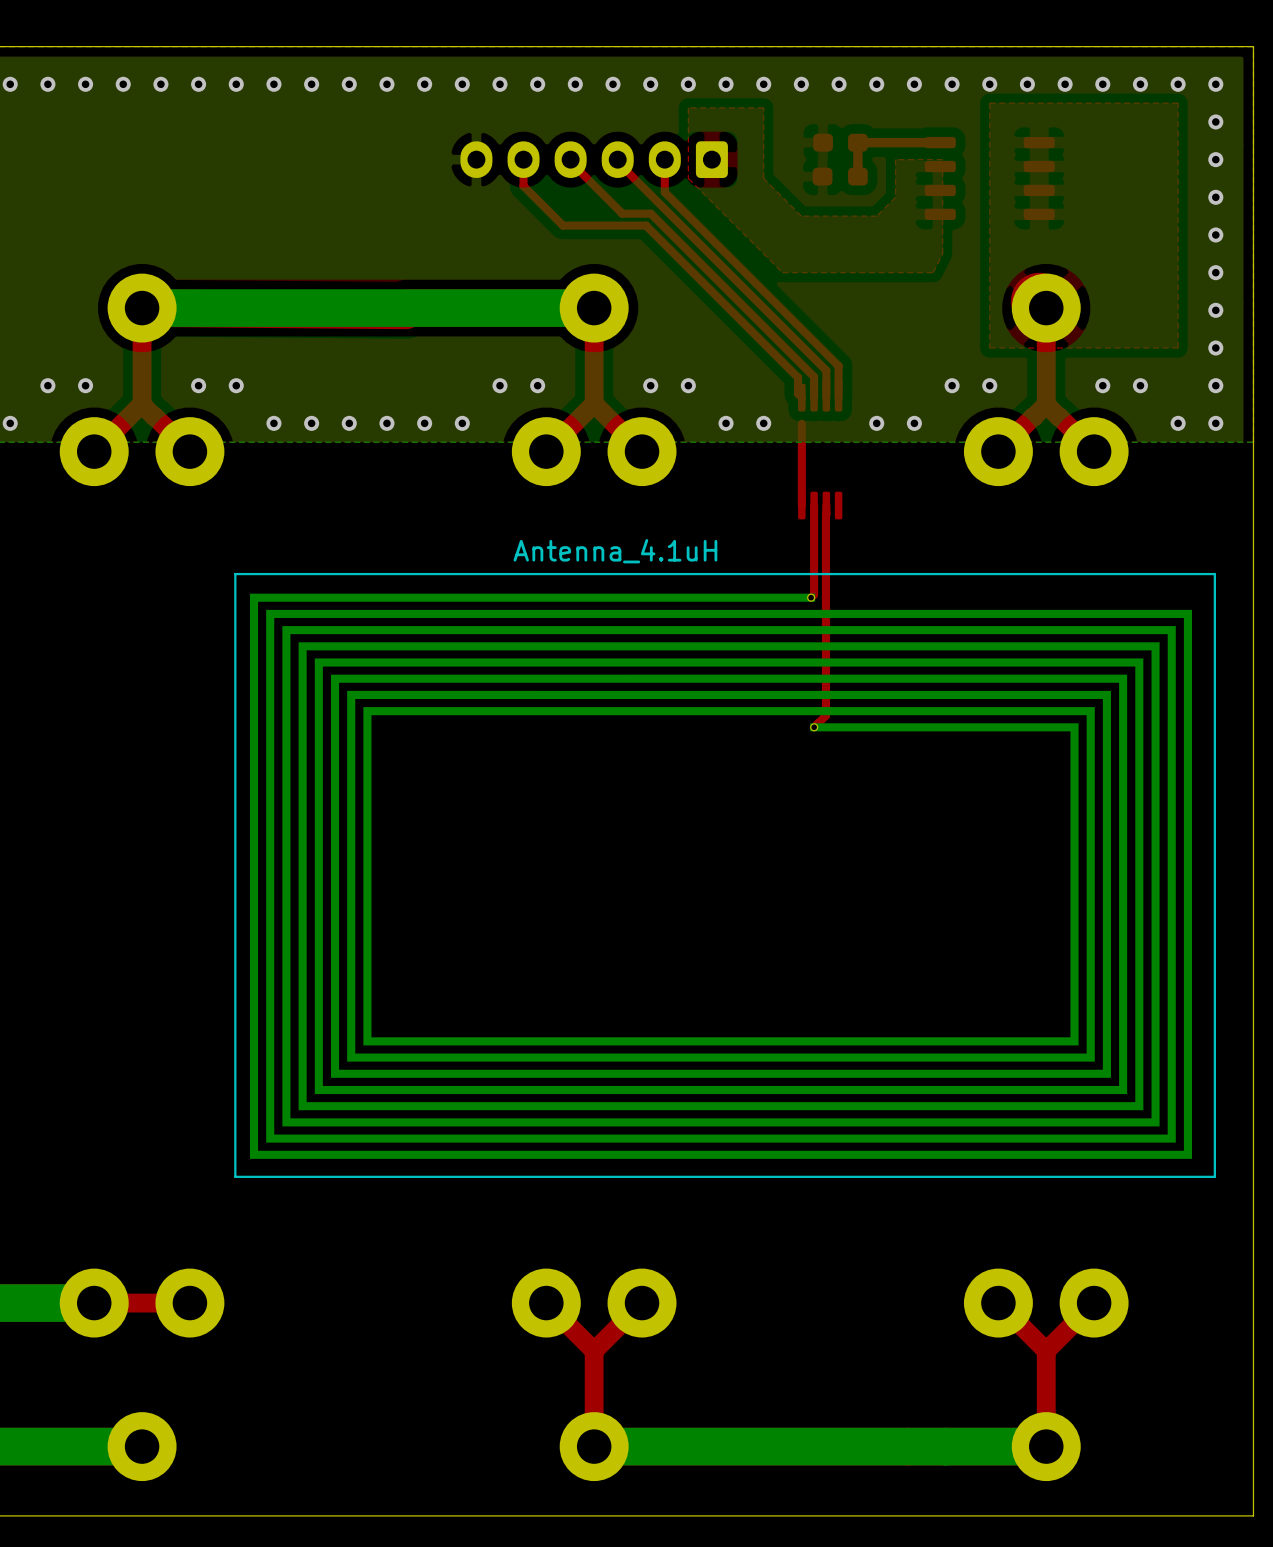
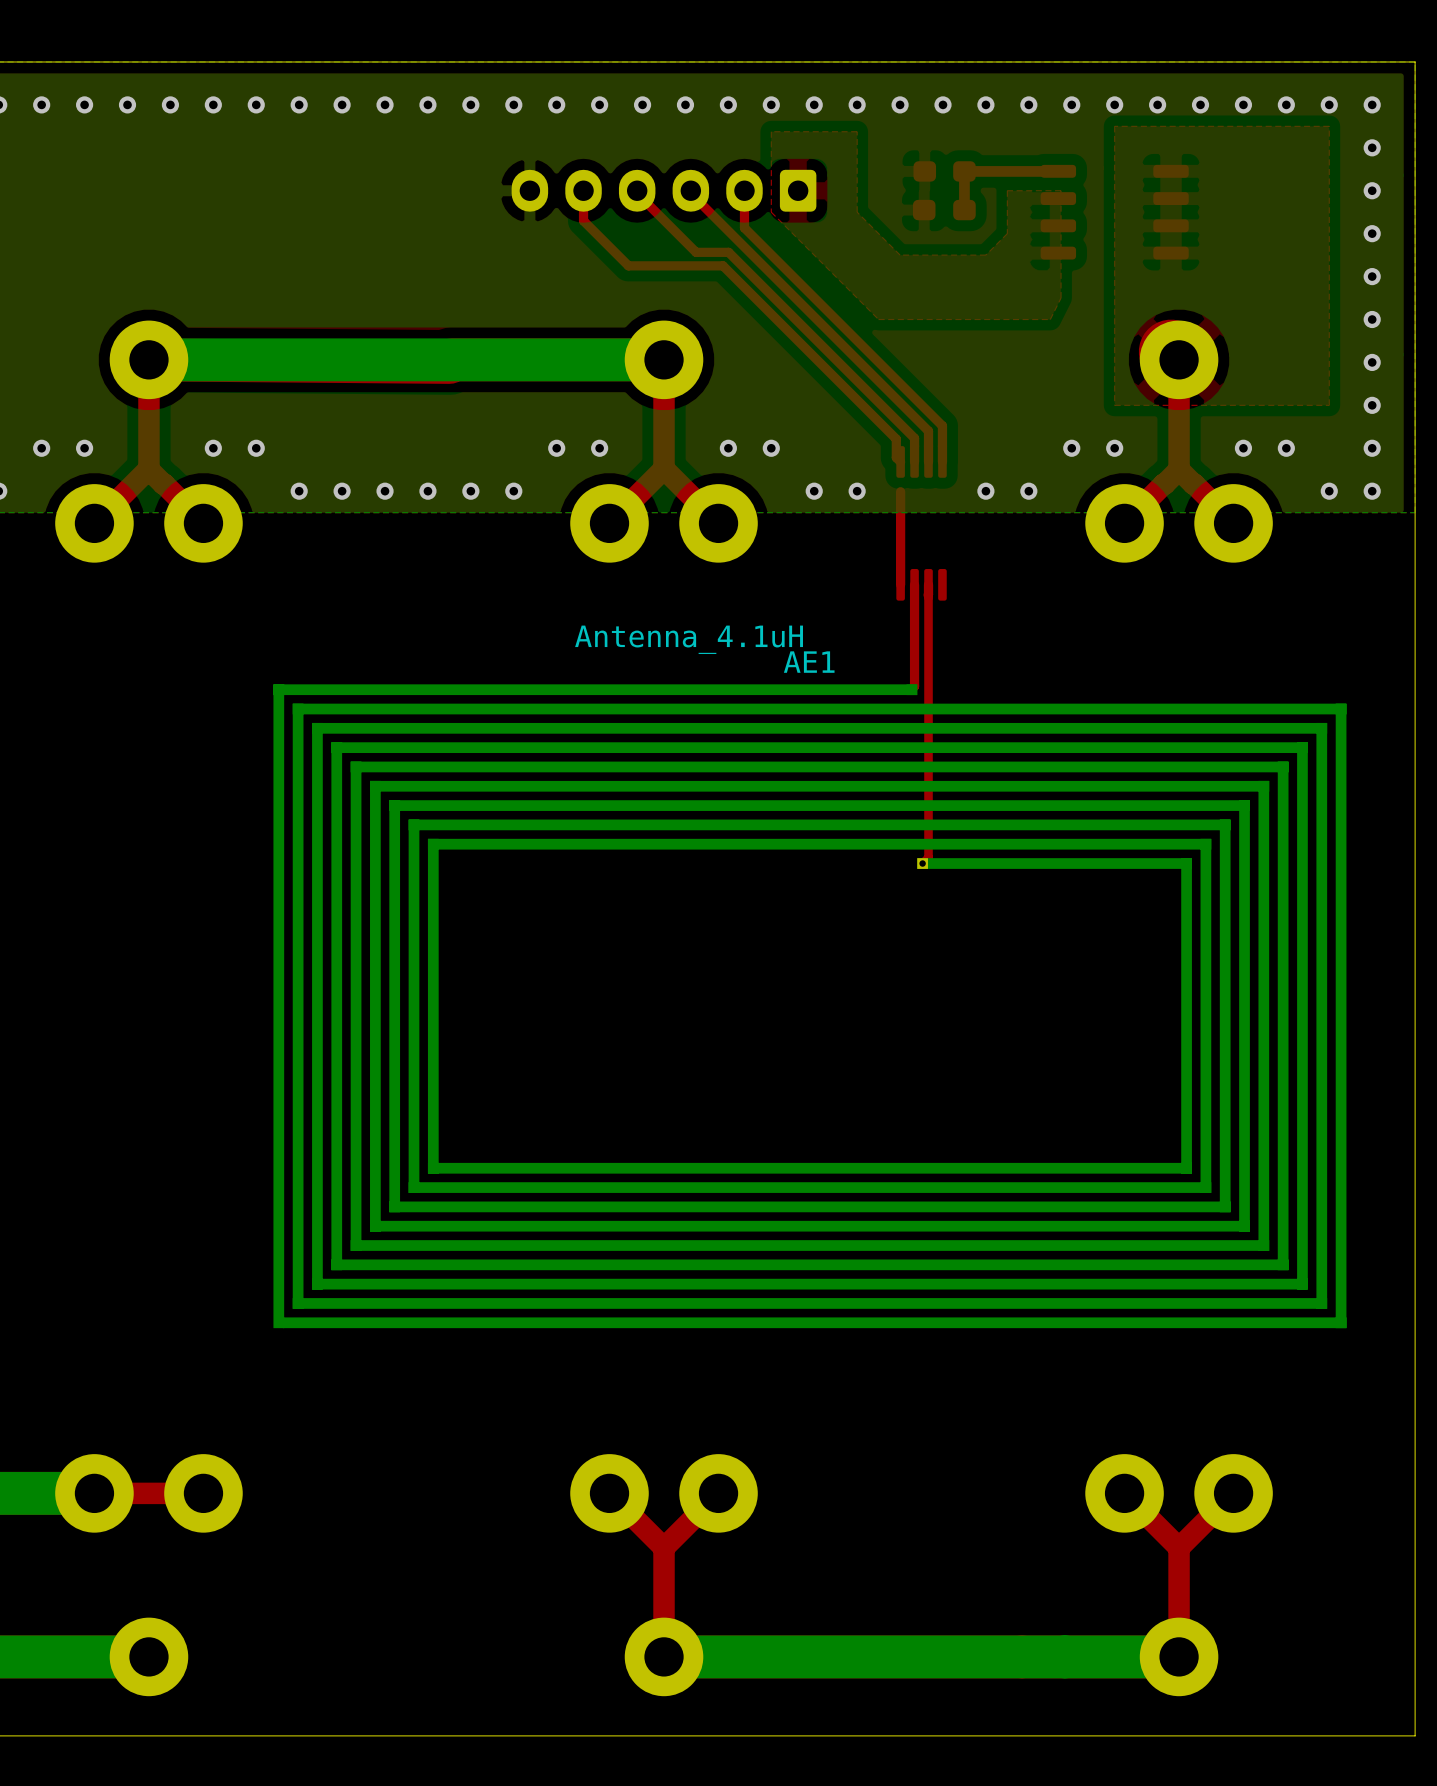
top track: none -> (928, 584) (928, 857) (922, 863)
top track: (825, 514) (825, 715) (814, 727) -> none
AE1: none -> (809, 1006)
part: (725, 875) -> none

